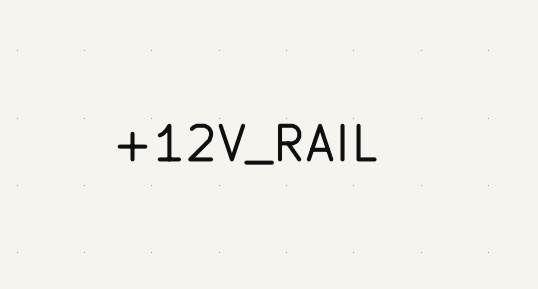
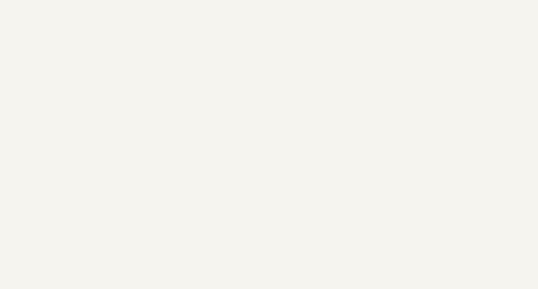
label: +12V_RAIL (247, 144) -> none

